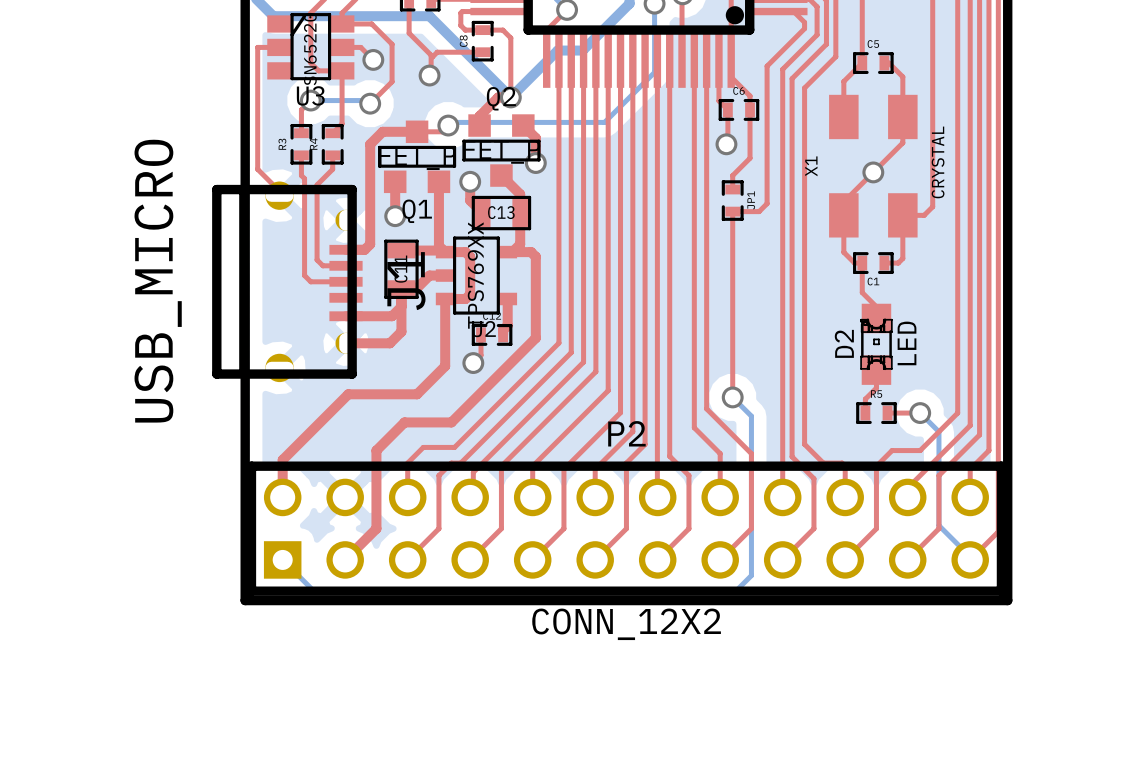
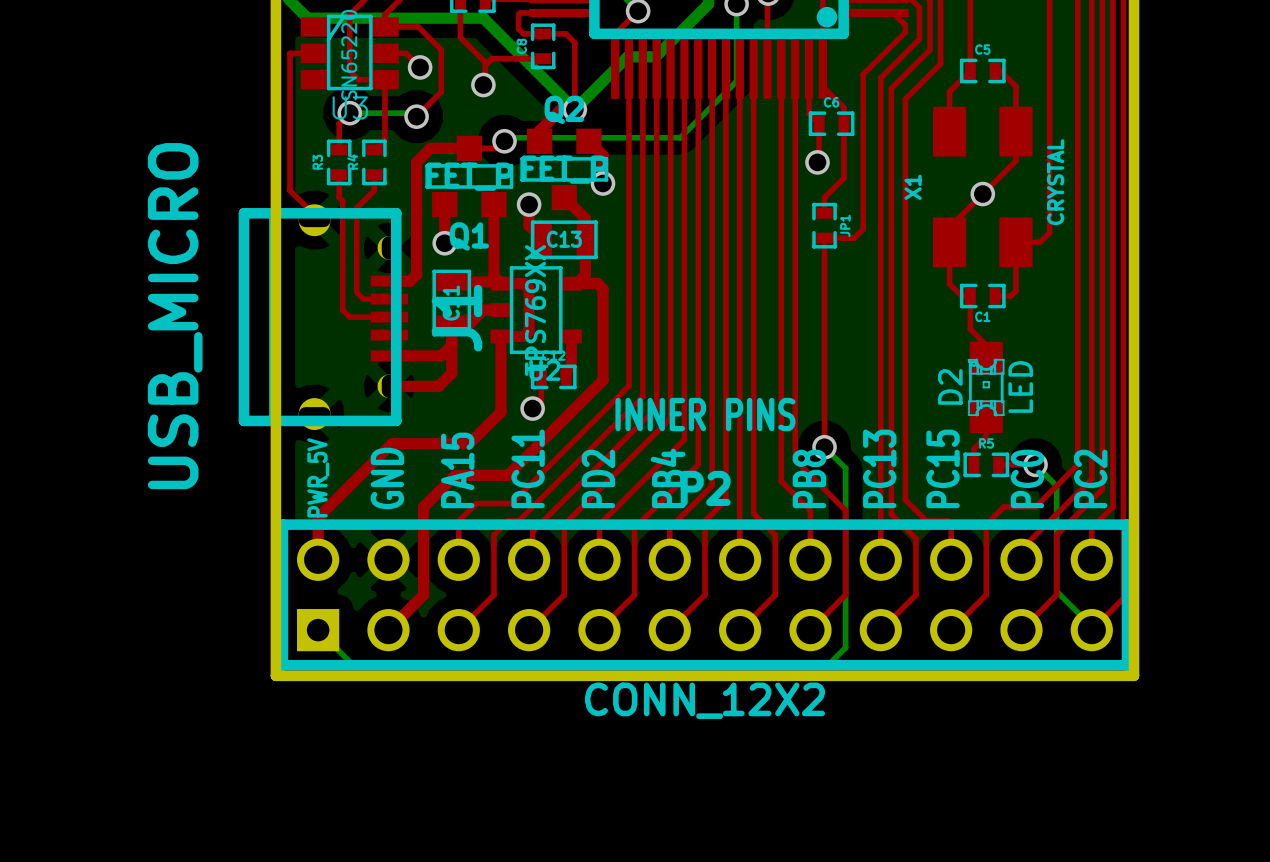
text: none -> INNER PINS (705, 414)
text: none -> PC11 (528, 468)
text: none -> PA15 (457, 470)
text: none -> PC13 (879, 468)
text: none -> PC15 (943, 468)
text: none -> PWR_5V (318, 477)
text: none -> PB4 (668, 478)
text: none -> GND (387, 478)
text: none -> PD2 (598, 478)
text: none -> PB8 (809, 478)
text: none -> PC0 (1027, 478)
text: none -> PC2 (1090, 478)

